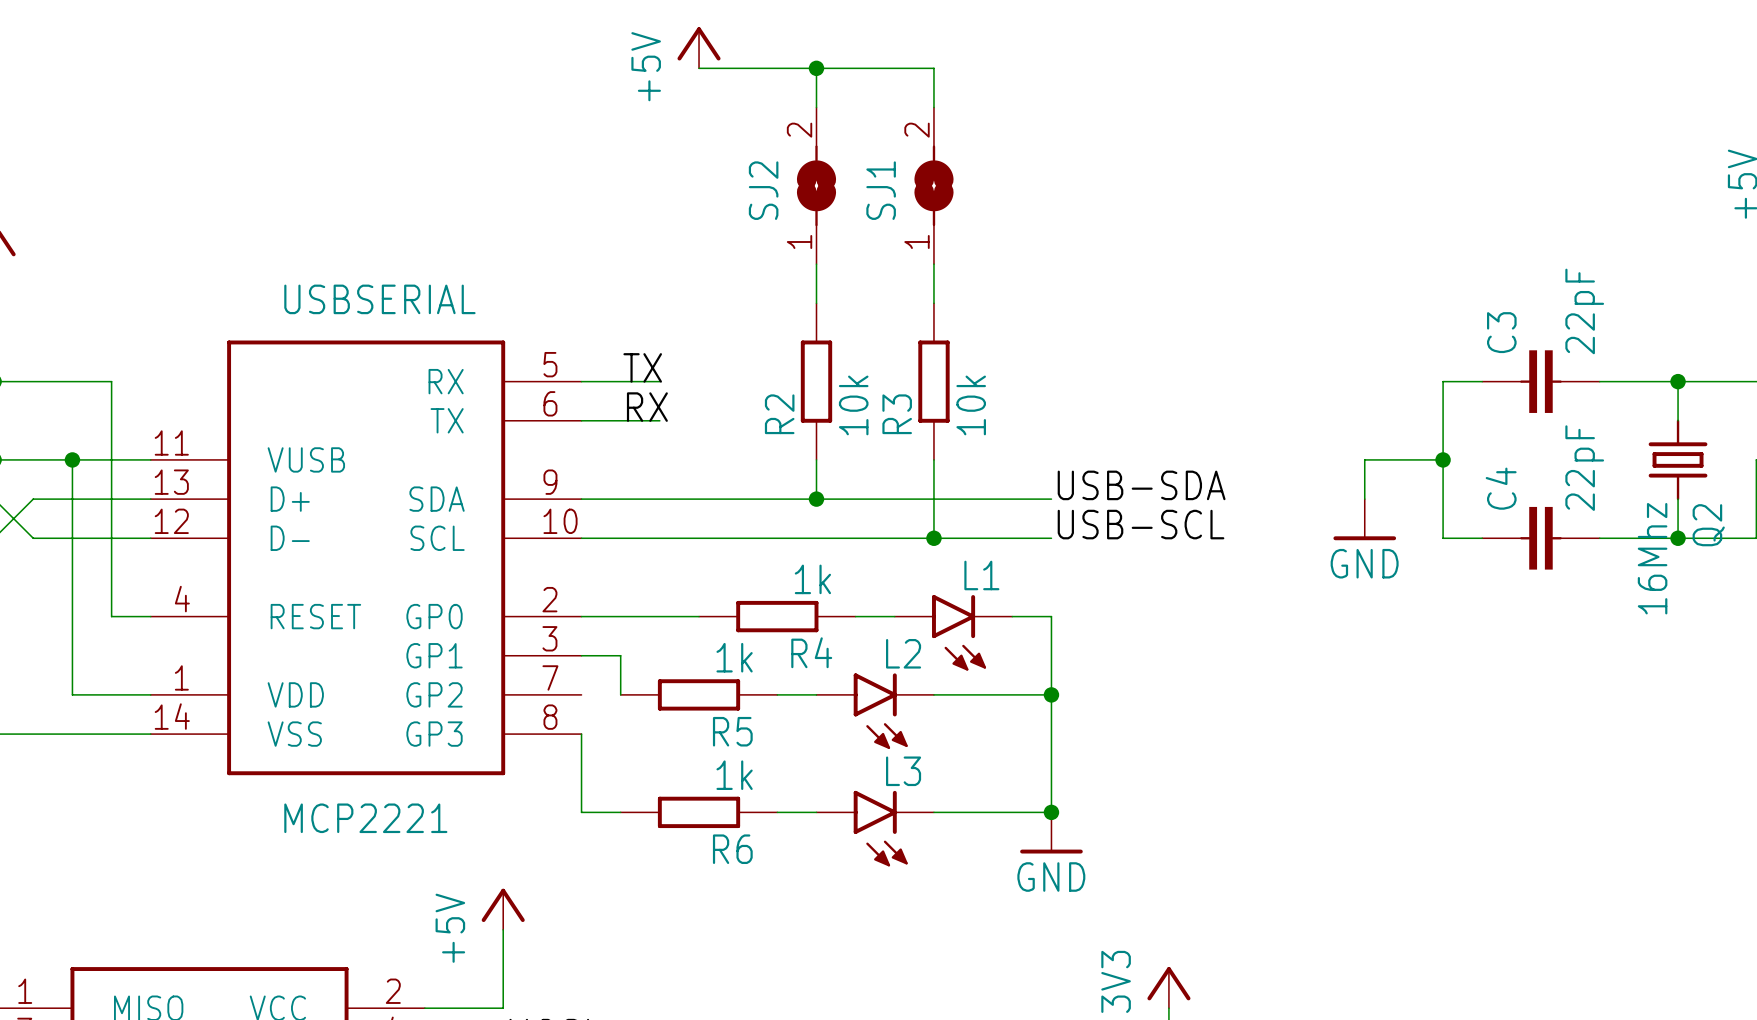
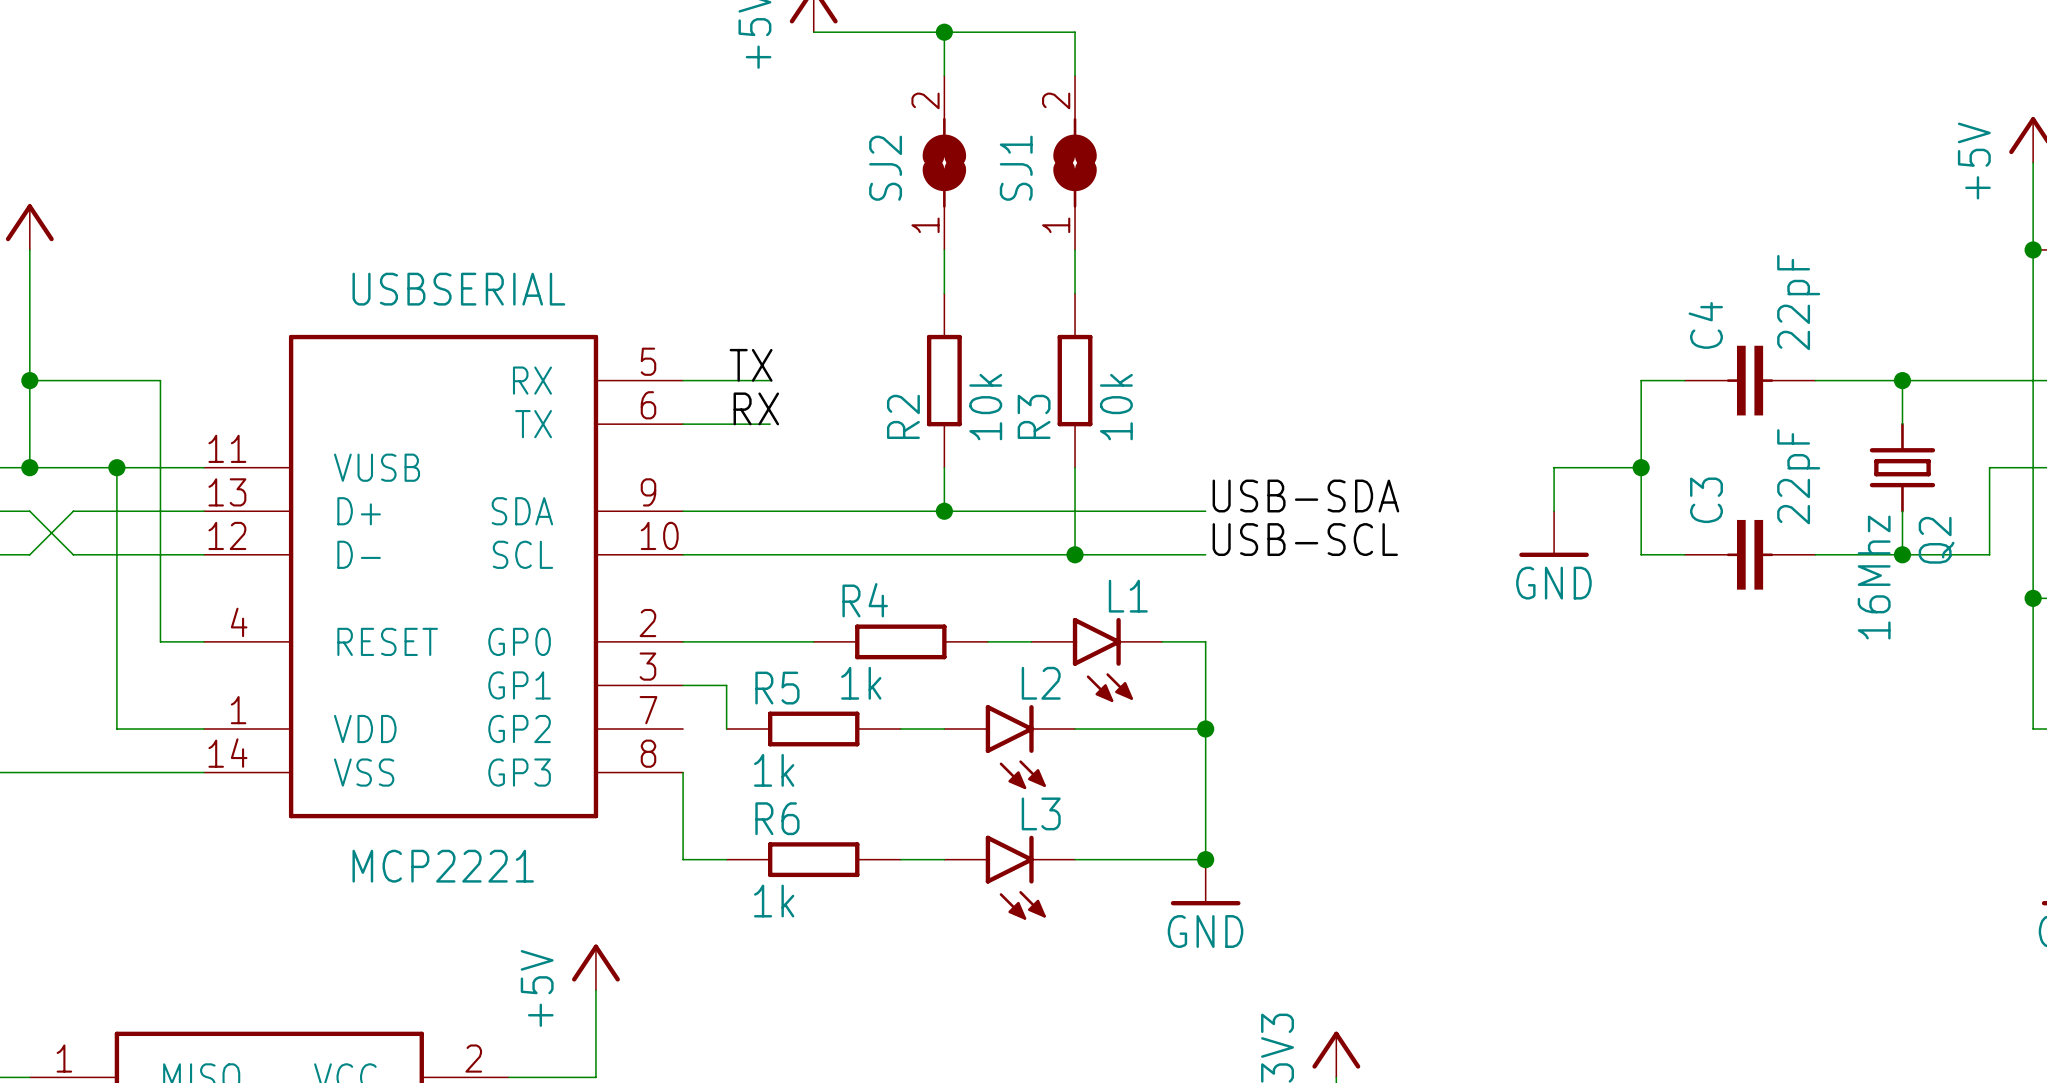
C3 name: C3 (1501, 332) -> C4 (1705, 325)
C4 name: C4 (1501, 488) -> C3 (1706, 500)
R4 value position: 1k (812, 579) -> 1k (861, 683)
R4 name position: R4 (811, 652) -> R4 (865, 600)
R5 value position: 1k (734, 657) -> 1k (774, 770)
R5 name position: R5 (732, 731) -> R5 (777, 688)
R6 value position: 1k (734, 775) -> 1k (774, 901)
R6 name position: R6 (732, 849) -> R6 (777, 818)

